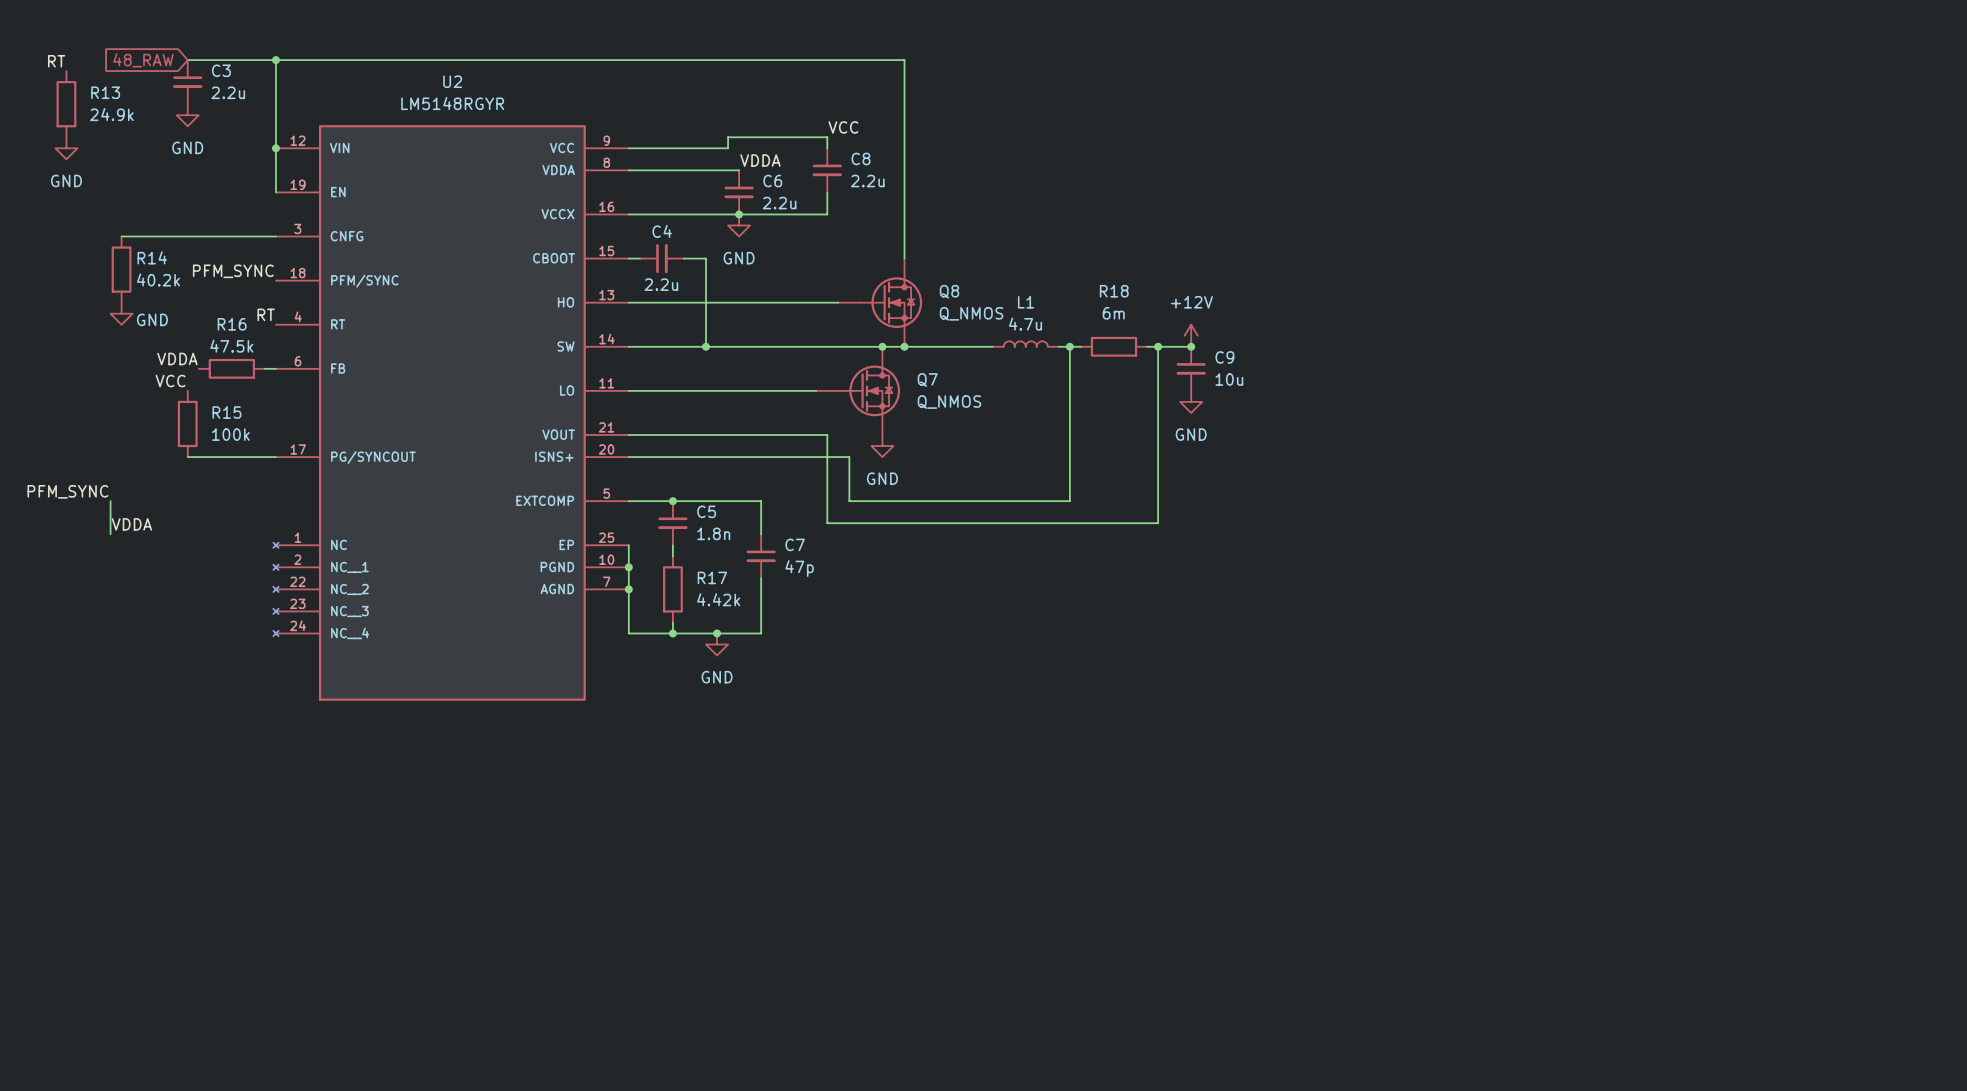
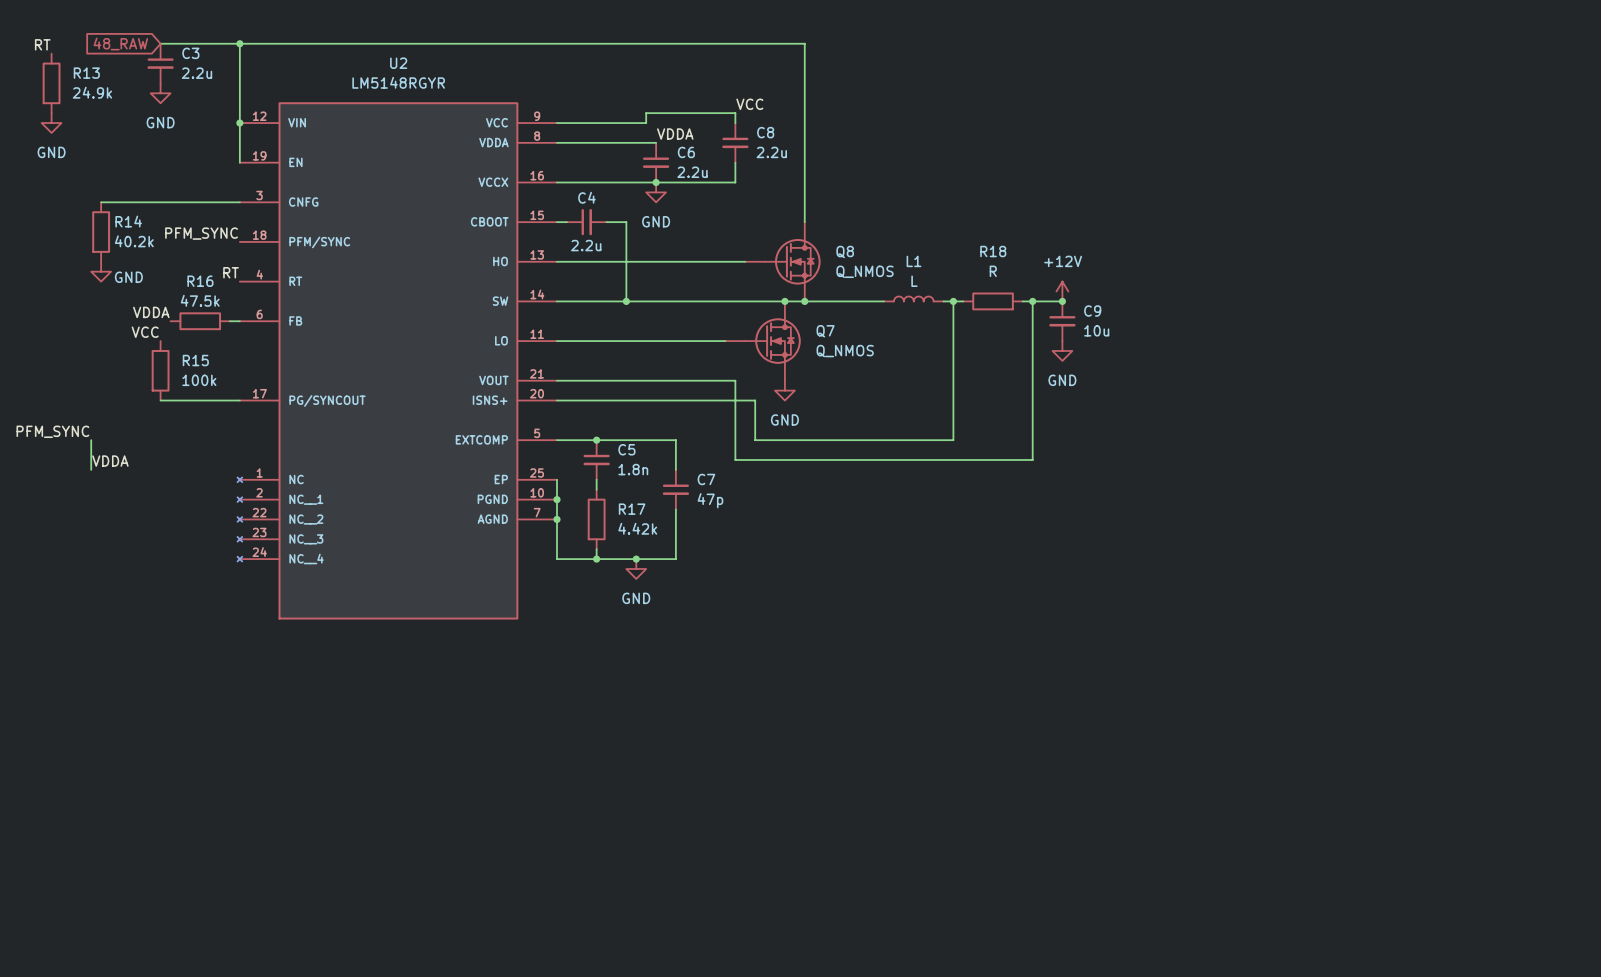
R18 value: 6m (1113, 313) -> R (993, 271)
L1 value: 4.7u (1025, 324) -> L (914, 281)

